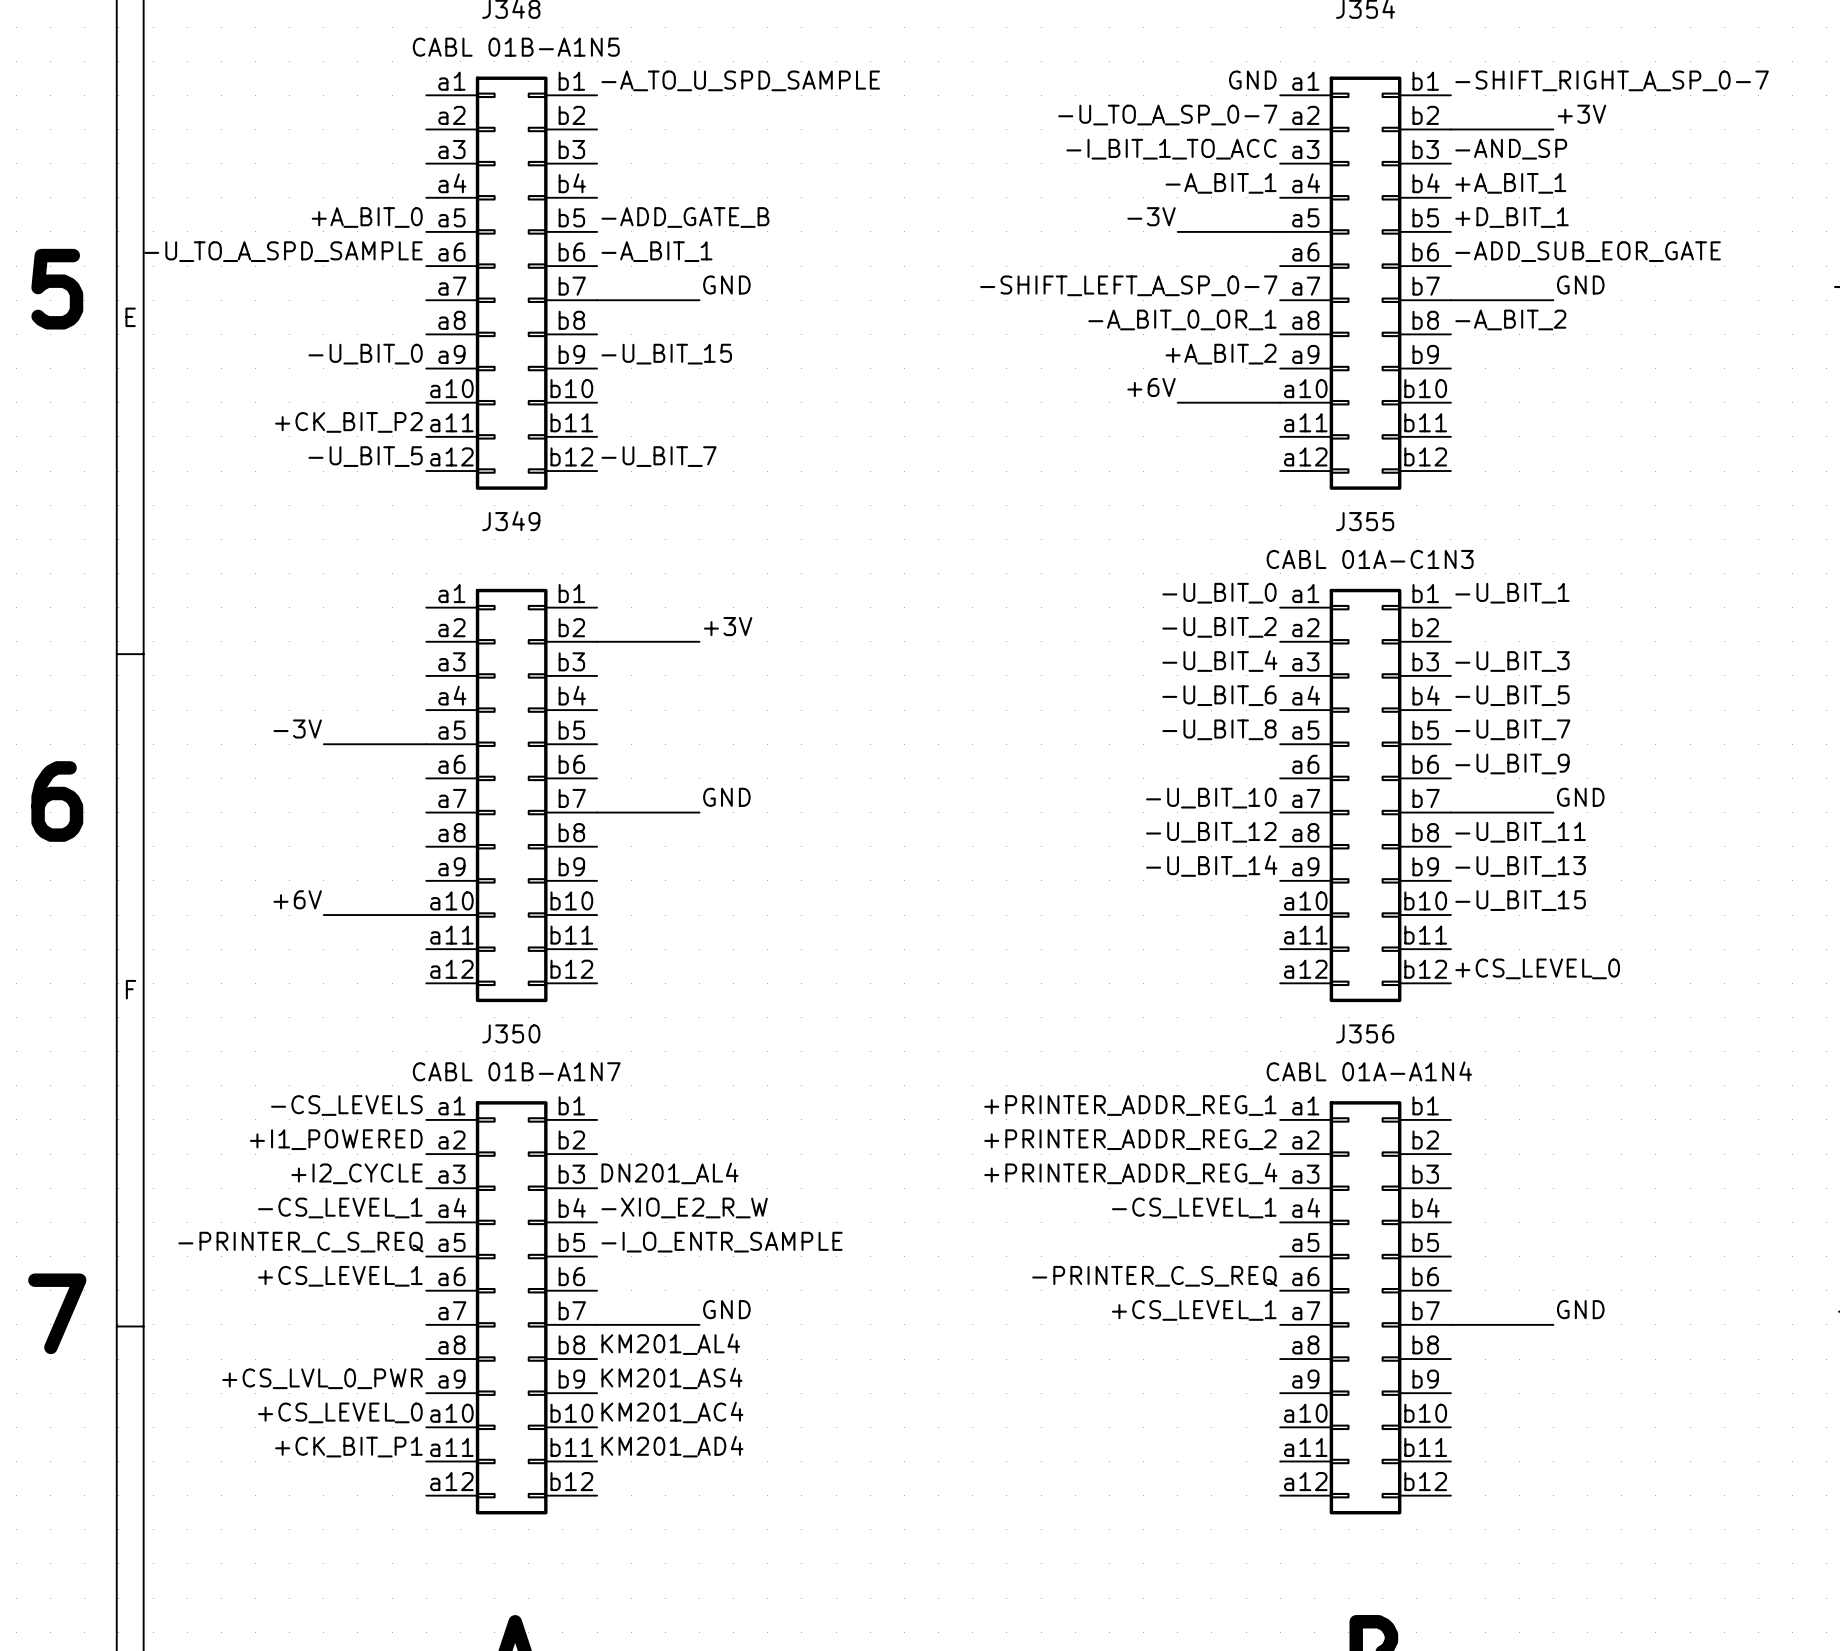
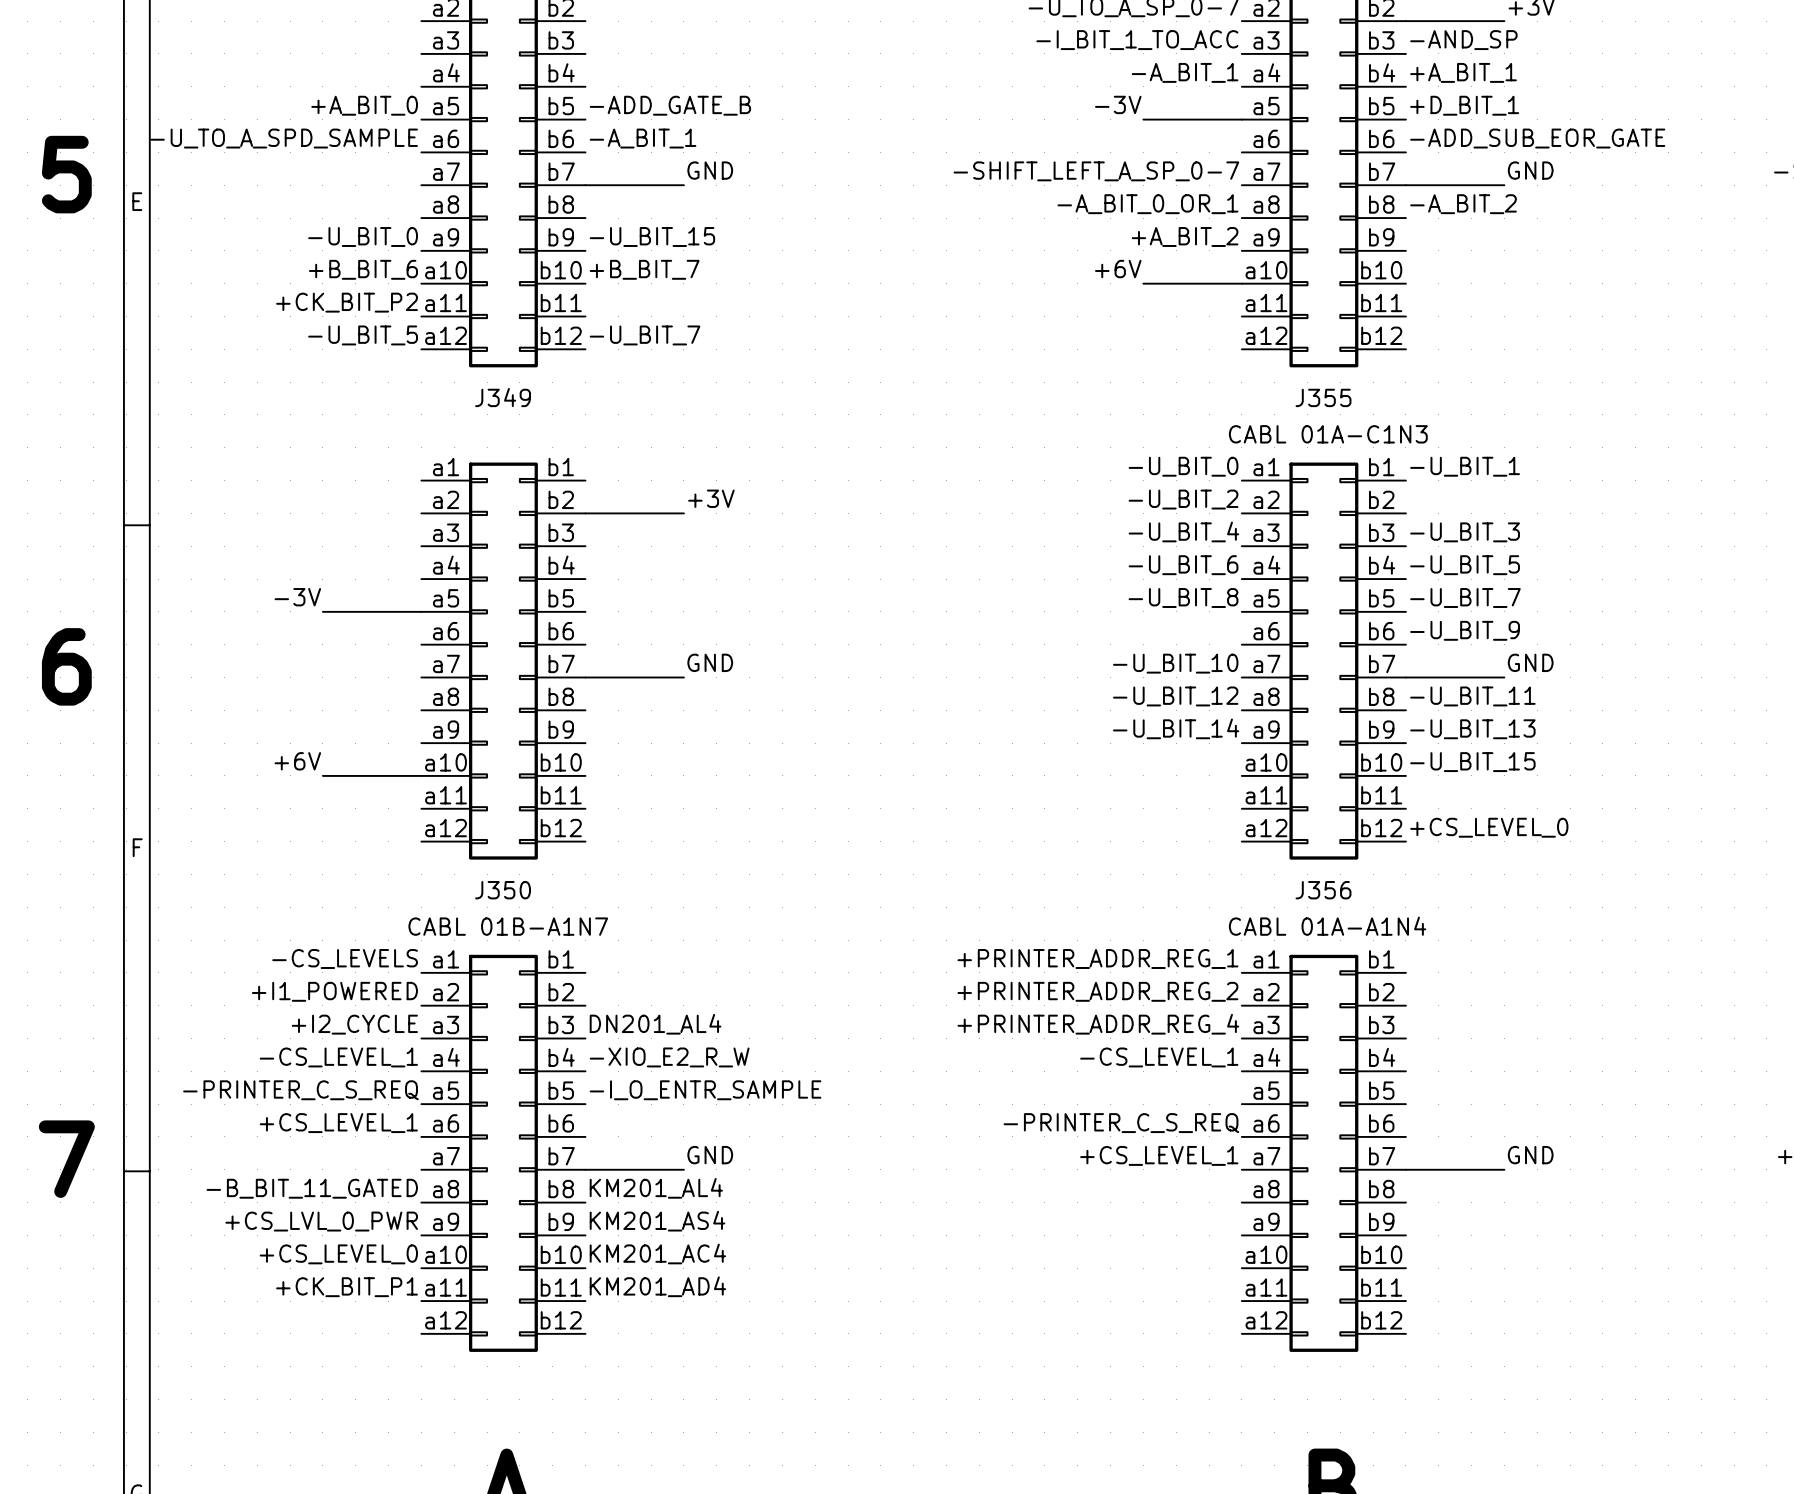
label: none -> +B_BIT_6 (363, 269)
label: none -> +B_BIT_7 (644, 269)
label: none -> -B_BIT_11_GATED (312, 1188)

